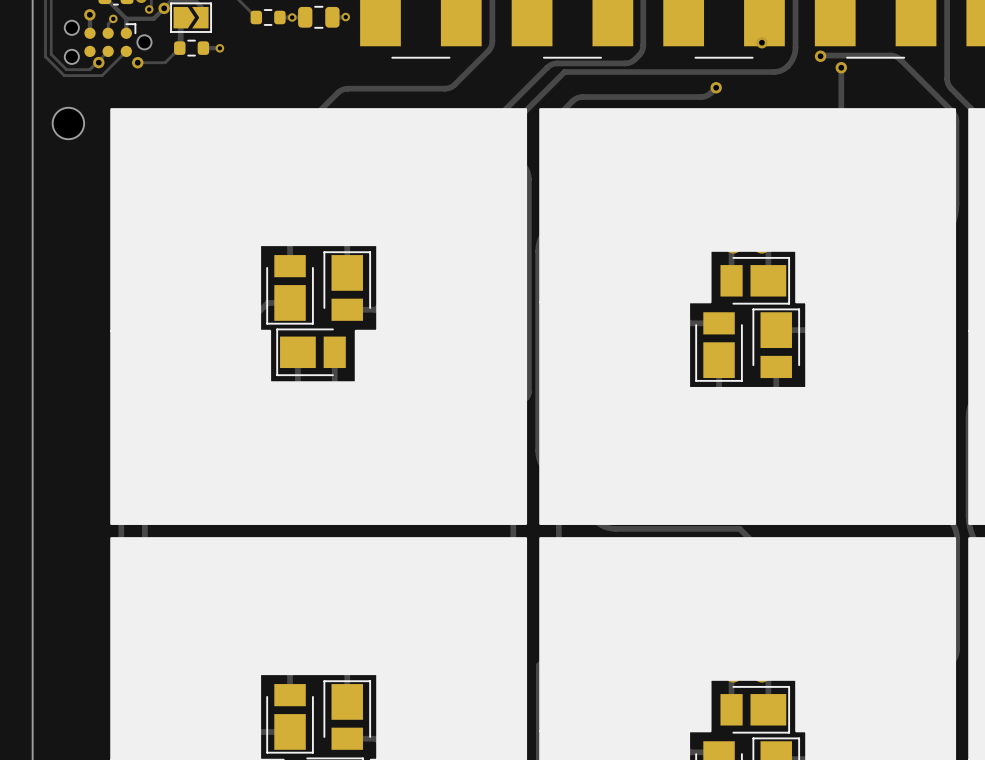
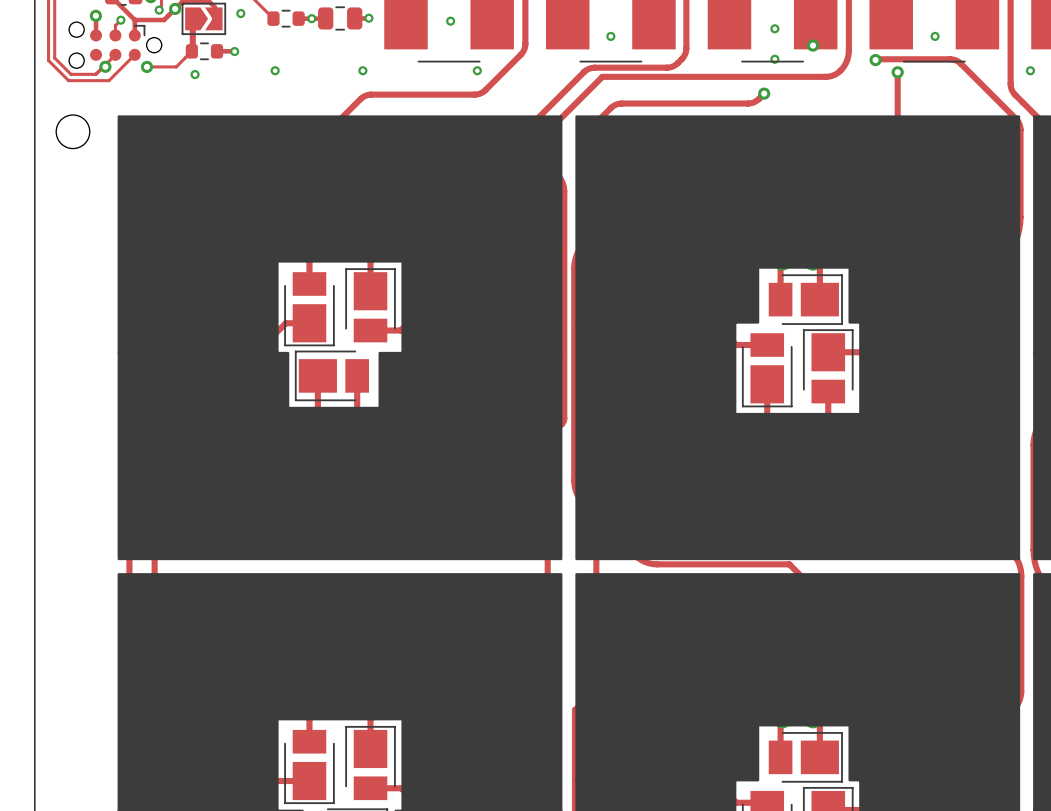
via: none -> (240, 13)
via: none -> (450, 21)
via: none -> (774, 28)
via: none -> (610, 36)
via: none -> (935, 36)
via: none -> (774, 59)
via: none -> (275, 70)
via: none -> (362, 70)
via: none -> (477, 70)
via: none -> (1030, 70)
via: none -> (195, 74)

